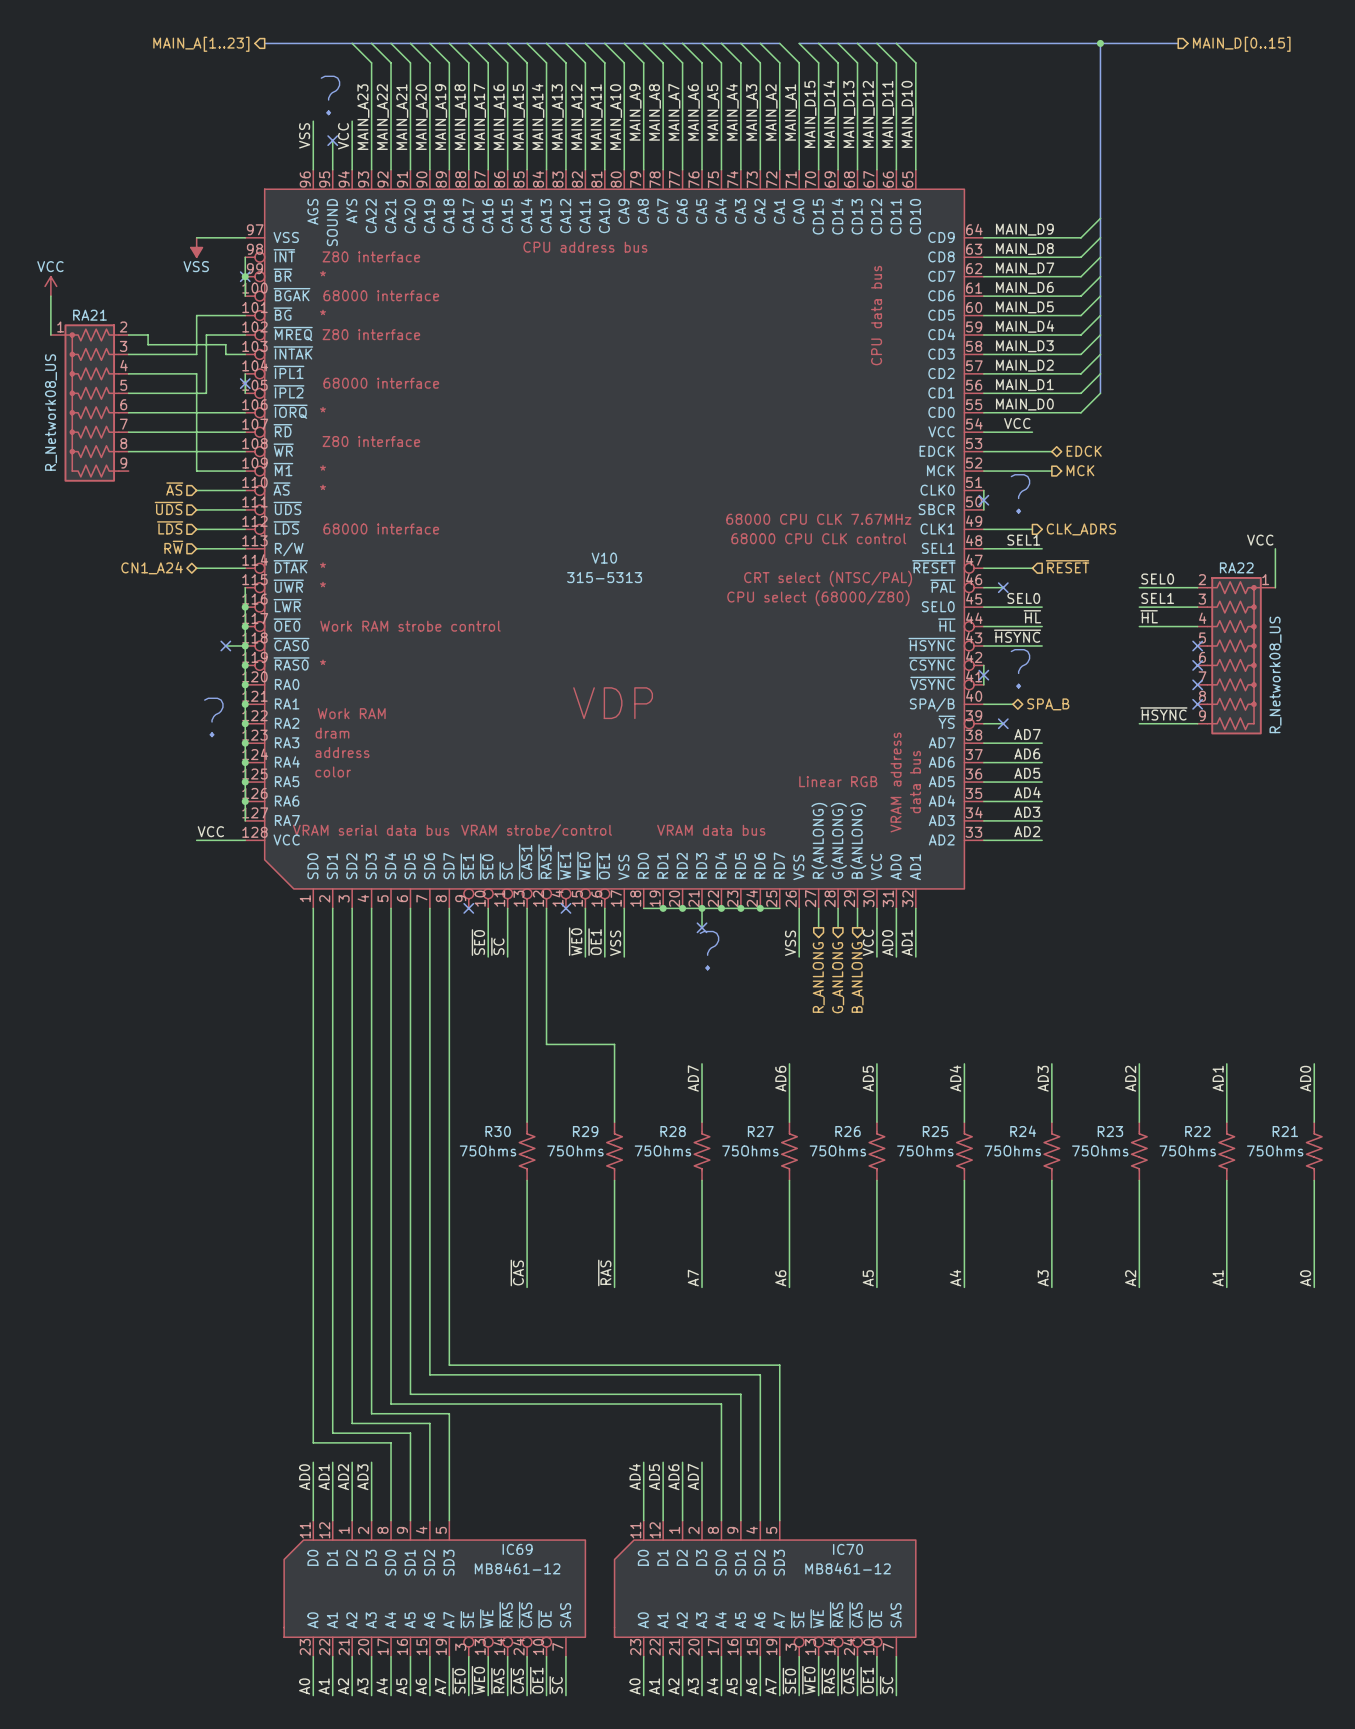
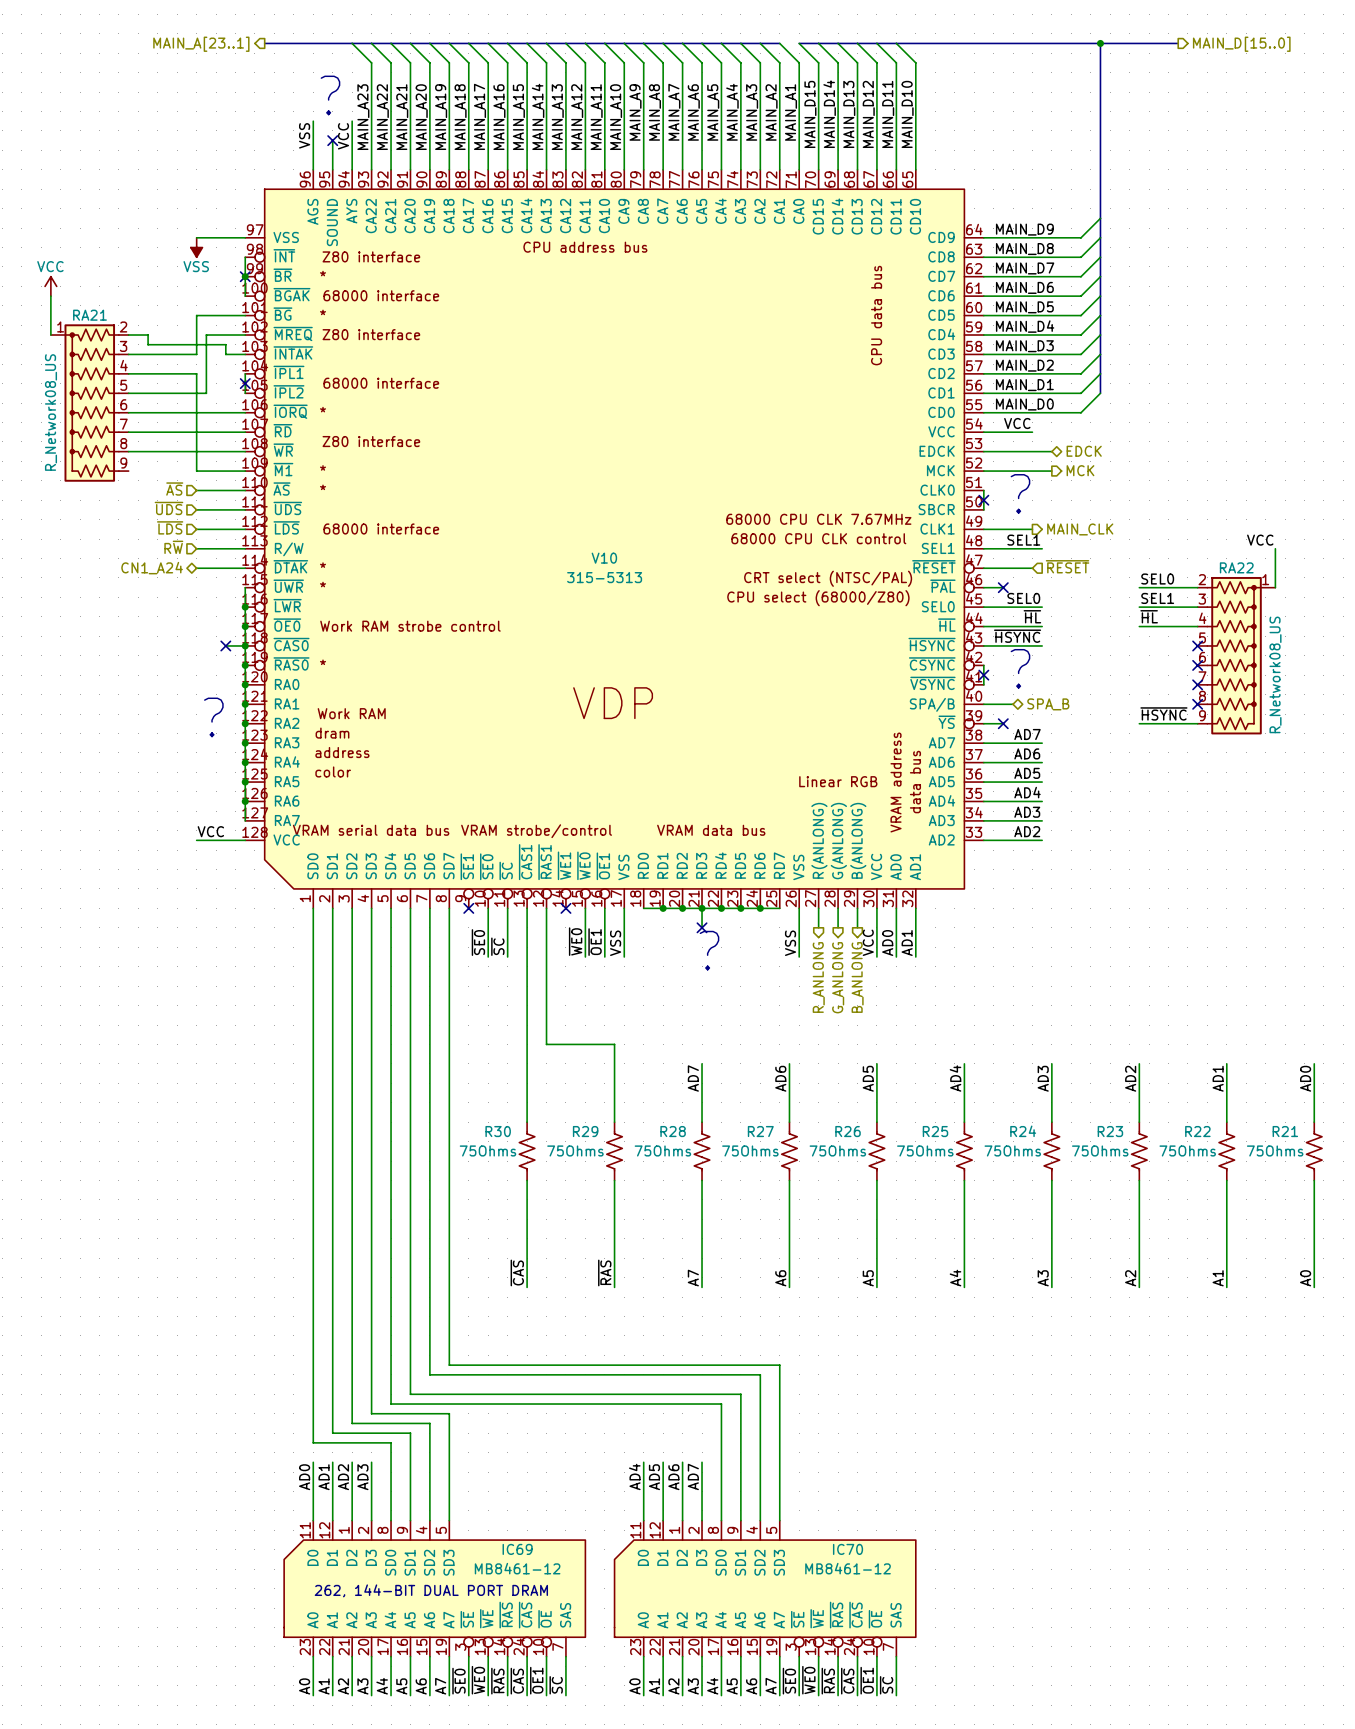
hierarchical label: MAIN_A[1..23] (201, 44) -> MAIN_A[23..1] (201, 44)
hierarchical label: MAIN_D[0..15] (1241, 44) -> MAIN_D[15..0] (1241, 44)
hierarchical label: CLK_ADRS (1081, 529) -> MAIN_CLK (1080, 529)
text: none -> 262, 144-BIT DUAL PORT DRAM (431, 1590)

